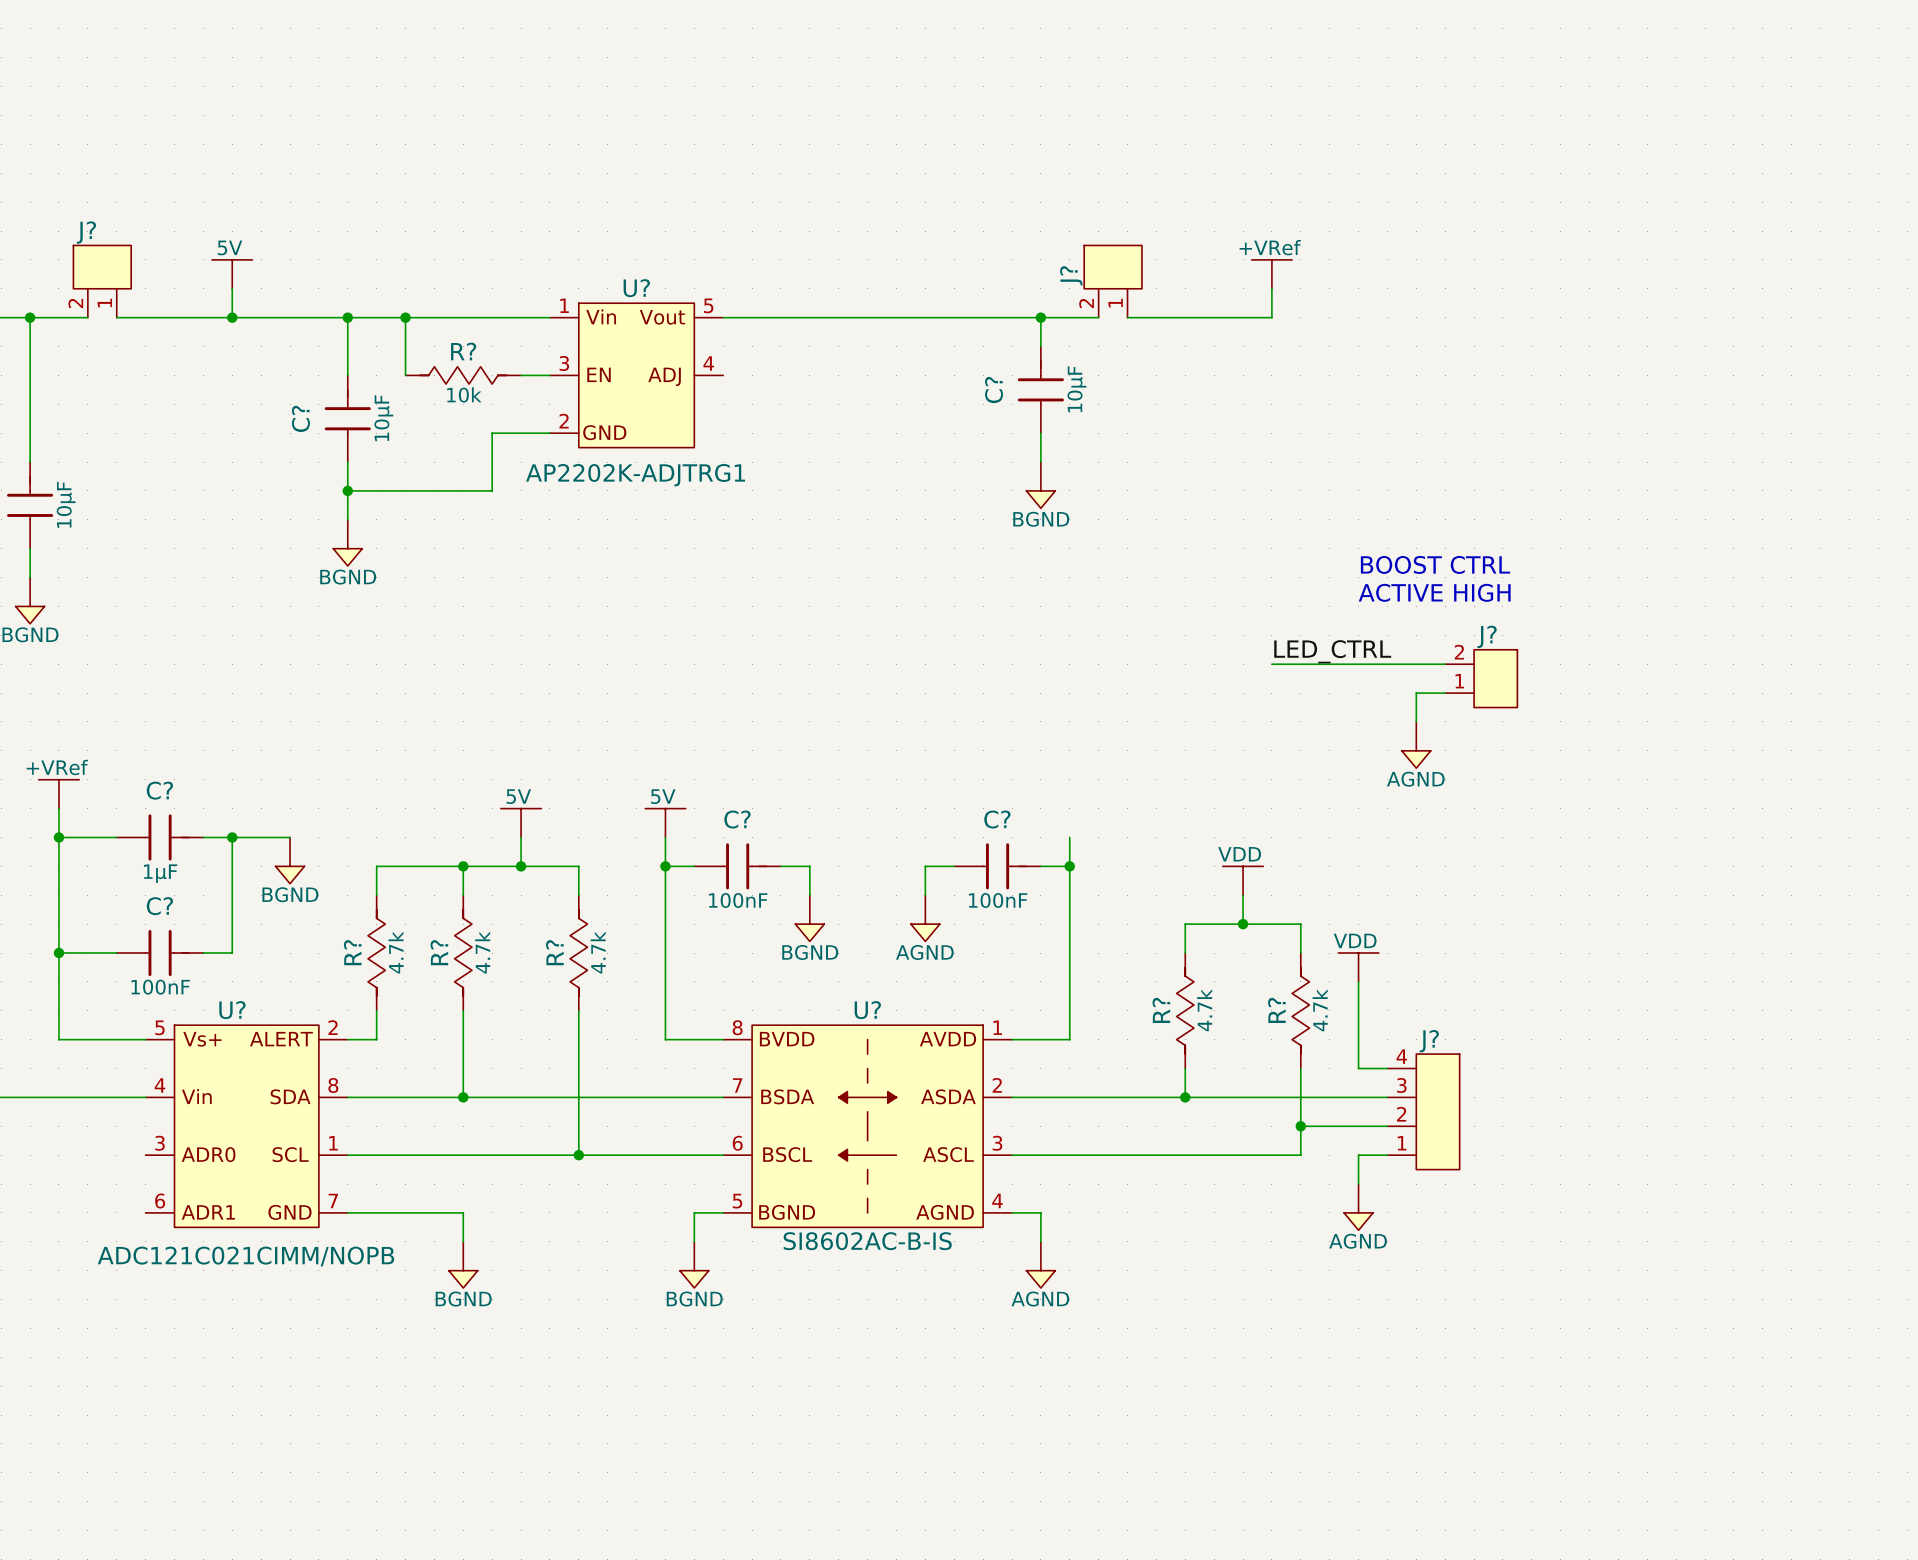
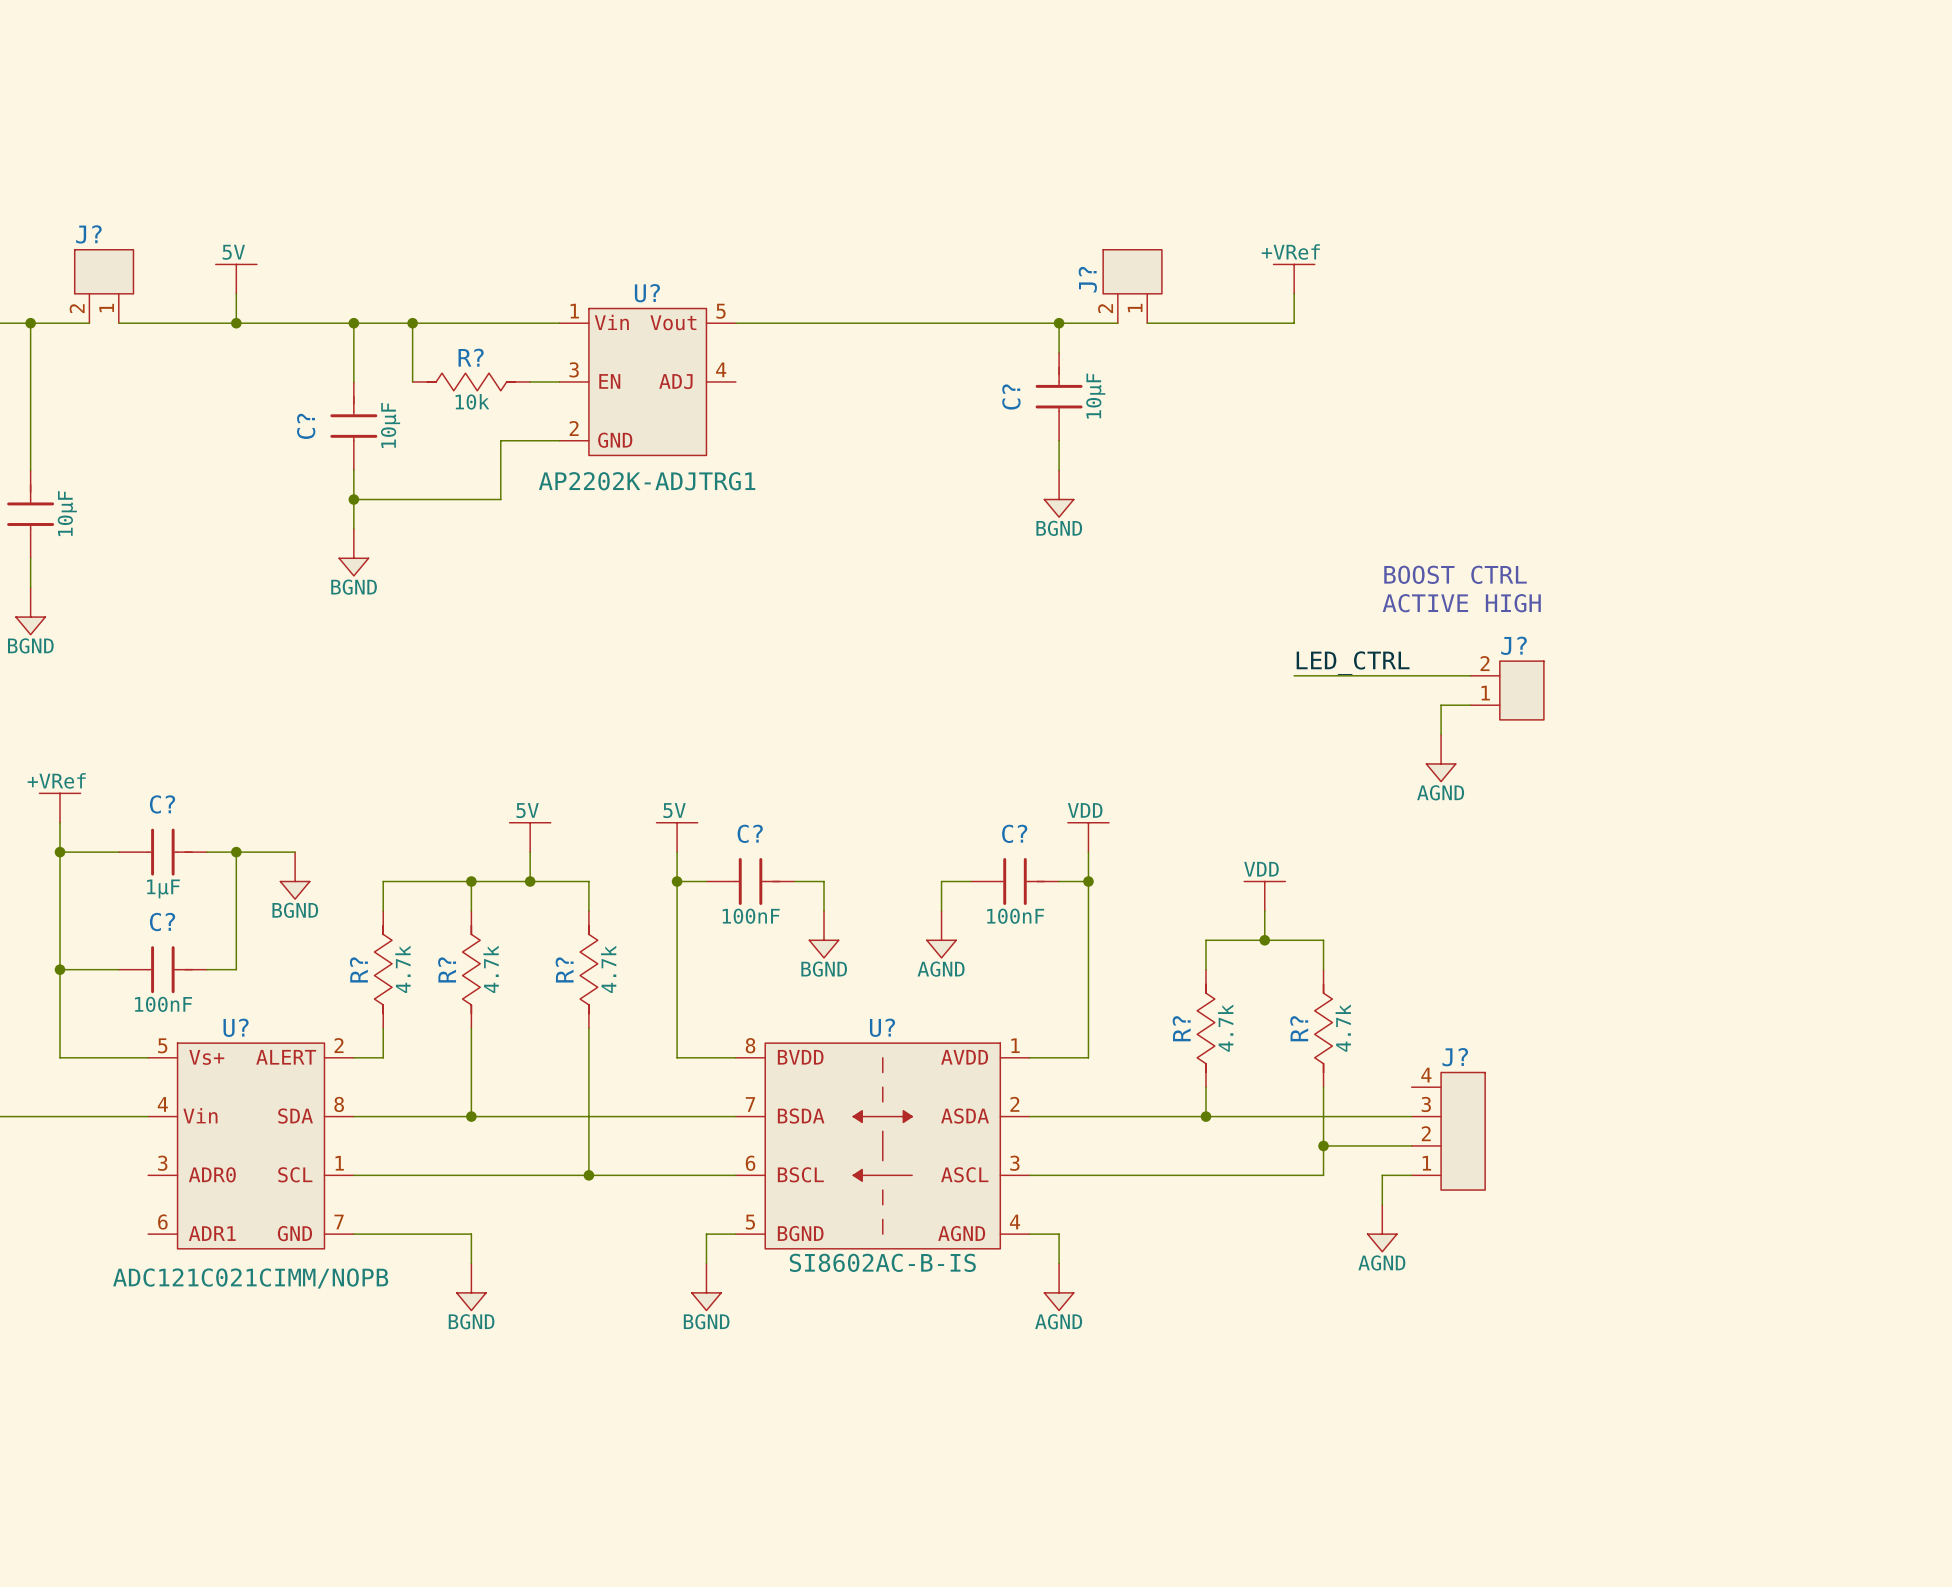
power symbol: none -> VDD (1088, 837)
power symbol: VDD (1358, 967) -> none
wire: (1358, 981) (1358, 1068) (1387, 1068) -> none

